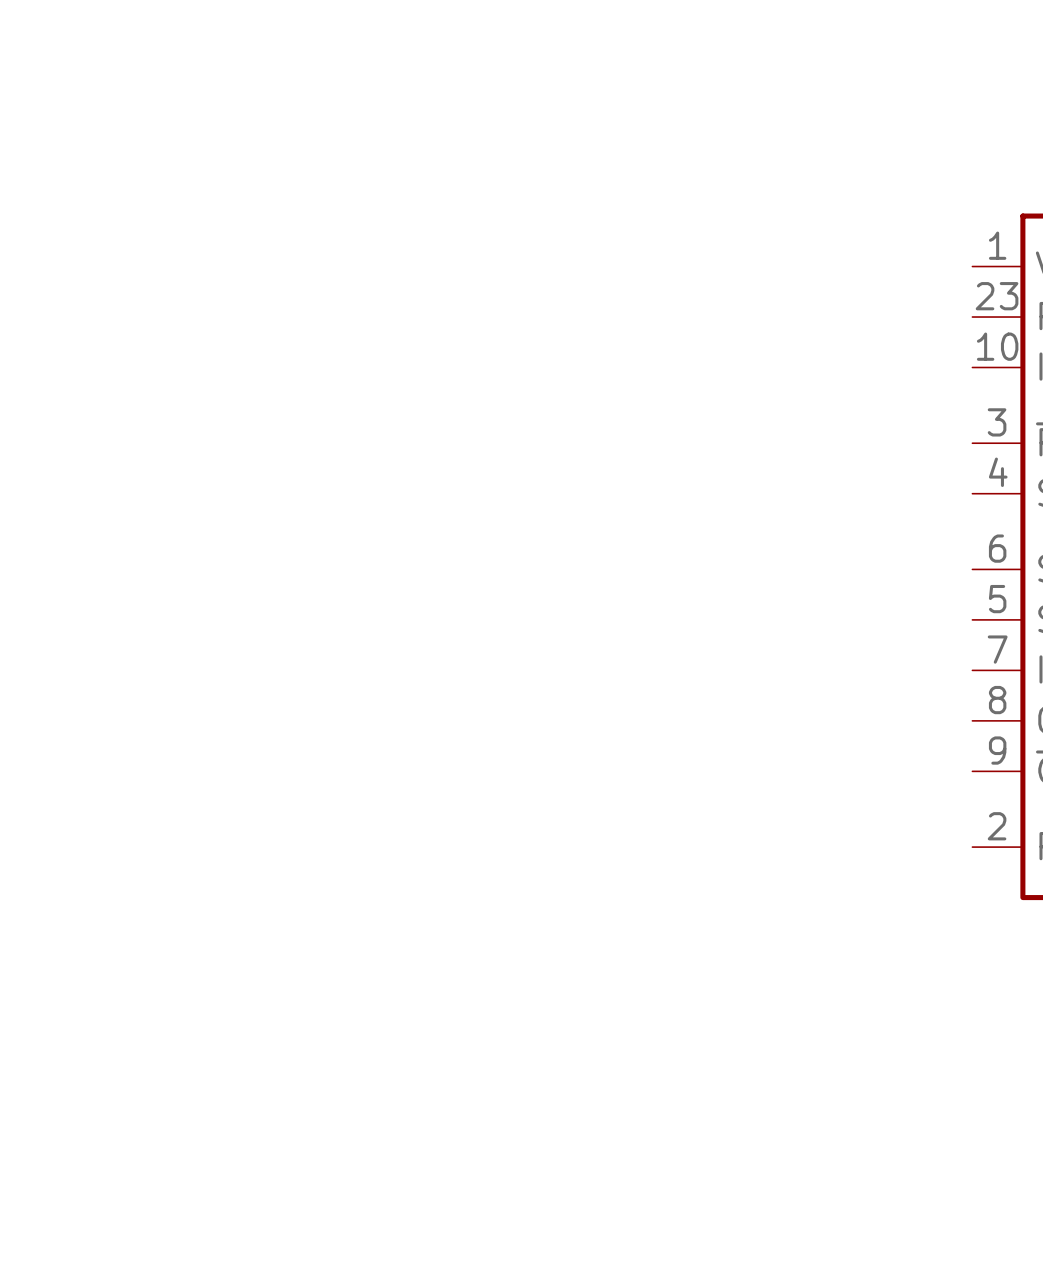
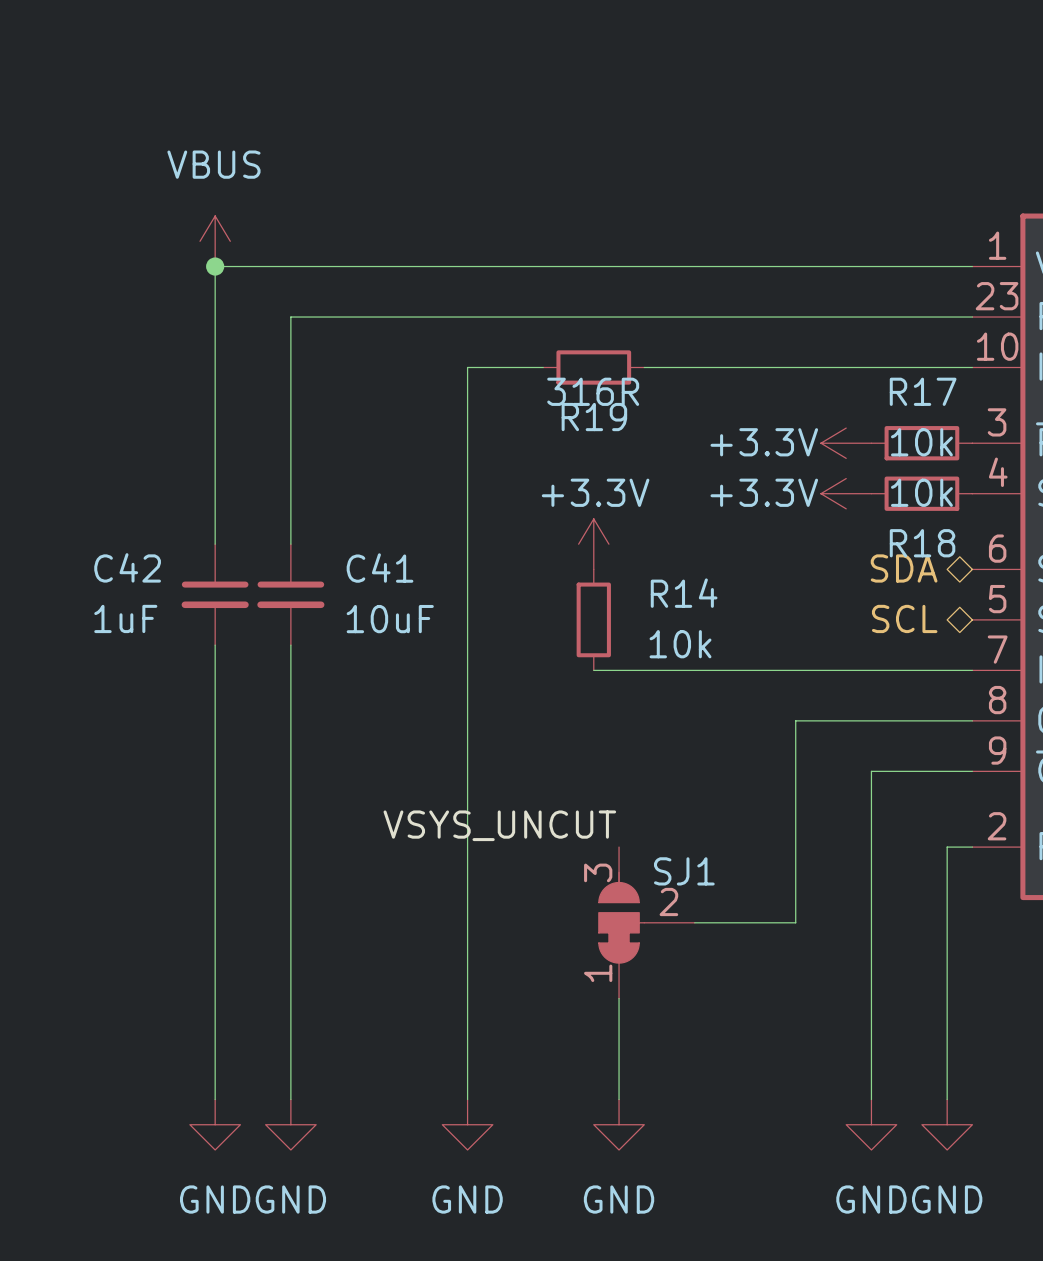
power symbol: none -> VBUS (215, 241)
junction: none -> (215, 266)
wire: none -> (972, 266) (215, 266) (215, 544)
wire: none -> (972, 317) (290, 317) (290, 544)
wire: none -> (543, 367) (467, 367) (467, 1099)
R19: none -> (593, 367)
wire: none -> (644, 367) (972, 367)
power symbol: none -> +3.3V (846, 443)
R17: none -> (921, 443)
power symbol: none -> +3.3V (846, 493)
R18: none -> (921, 493)
power symbol: none -> +3.3V (593, 544)
hierarchical label: none -> SDA (904, 568)
C42: none -> (215, 594)
C41: none -> (290, 594)
hierarchical label: none -> SCL (904, 618)
R14: none -> (593, 619)
wire: none -> (215, 645) (215, 1099)
wire: none -> (290, 645) (290, 1099)
wire: none -> (593, 670) (972, 670)
wire: none -> (972, 720) (795, 720) (795, 922) (694, 922)
wire: none -> (972, 771) (871, 771) (871, 1099)
label: none -> VSYS_UNCUT (499, 825)
wire: none -> (972, 847) (947, 847) (947, 1099)
SJ1: none -> (646, 922)
wire: none -> (619, 998) (619, 1099)
power symbol: none -> GND (215, 1124)
power symbol: none -> GND (290, 1124)
power symbol: none -> GND (467, 1124)
power symbol: none -> GND (619, 1124)
power symbol: none -> GND (871, 1124)
power symbol: none -> GND (947, 1124)

